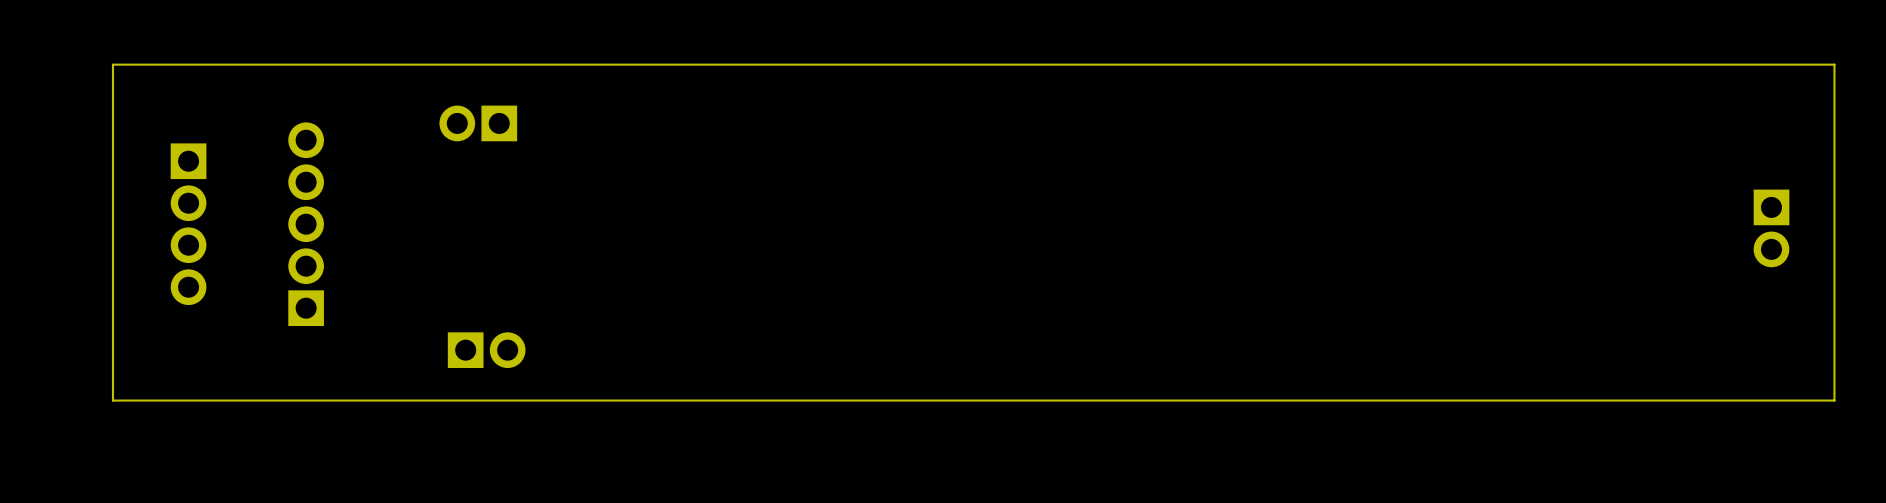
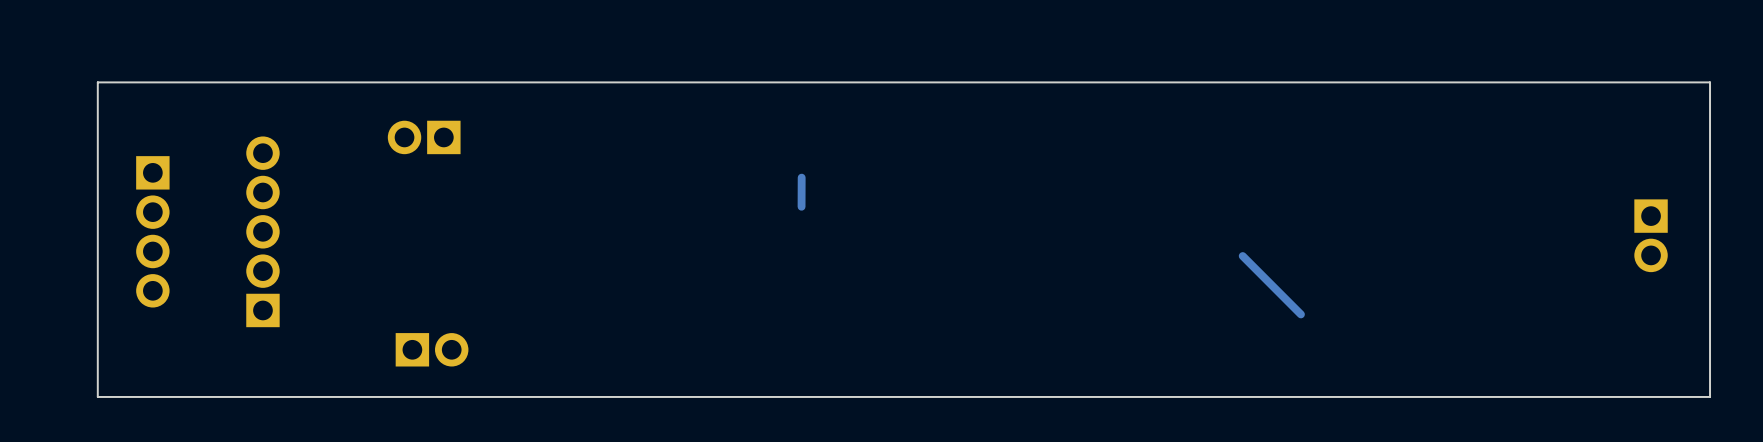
part position: (478, 123) -> (424, 137)
track: none -> (801, 177) (801, 206)
part position: (188, 224) -> (152, 231)
part position: (306, 224) -> (262, 231)
track: none -> (1242, 256) (1300, 314)
part position: (486, 350) -> (432, 349)

